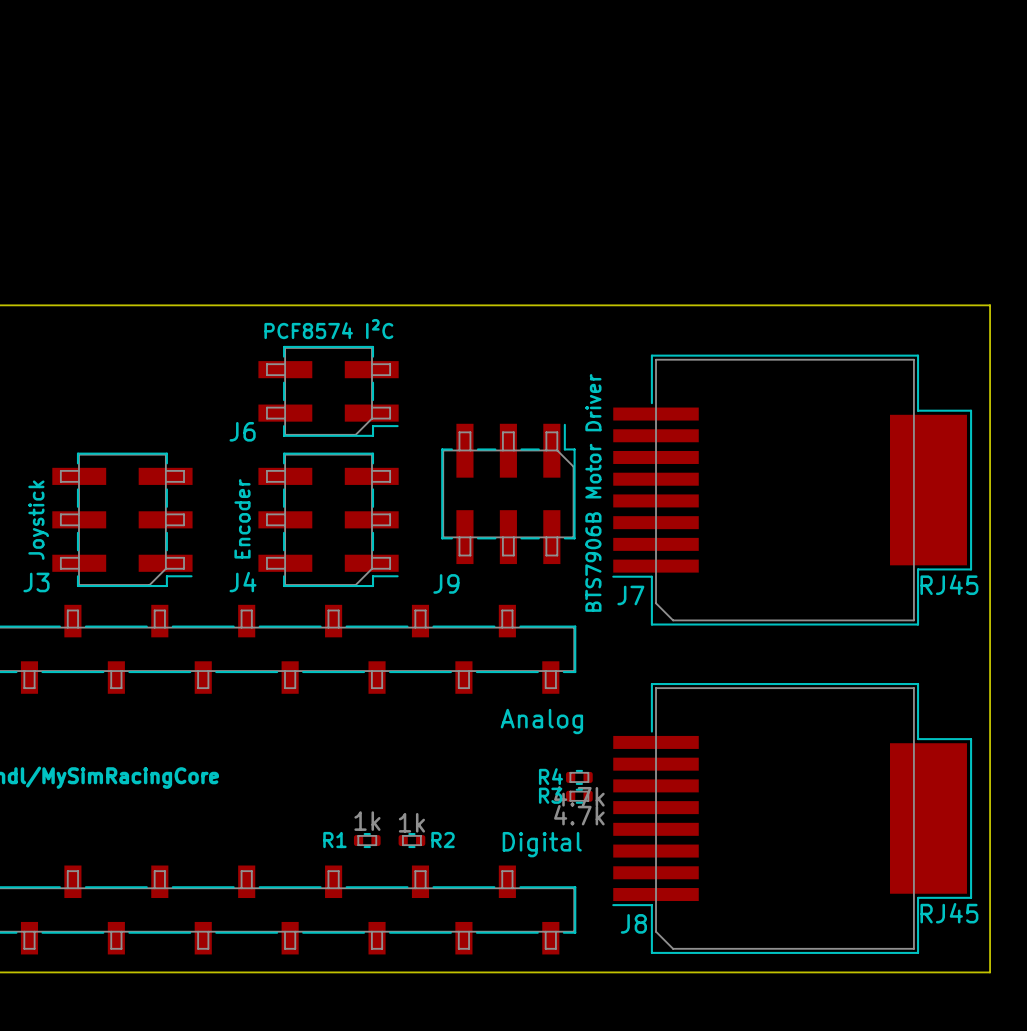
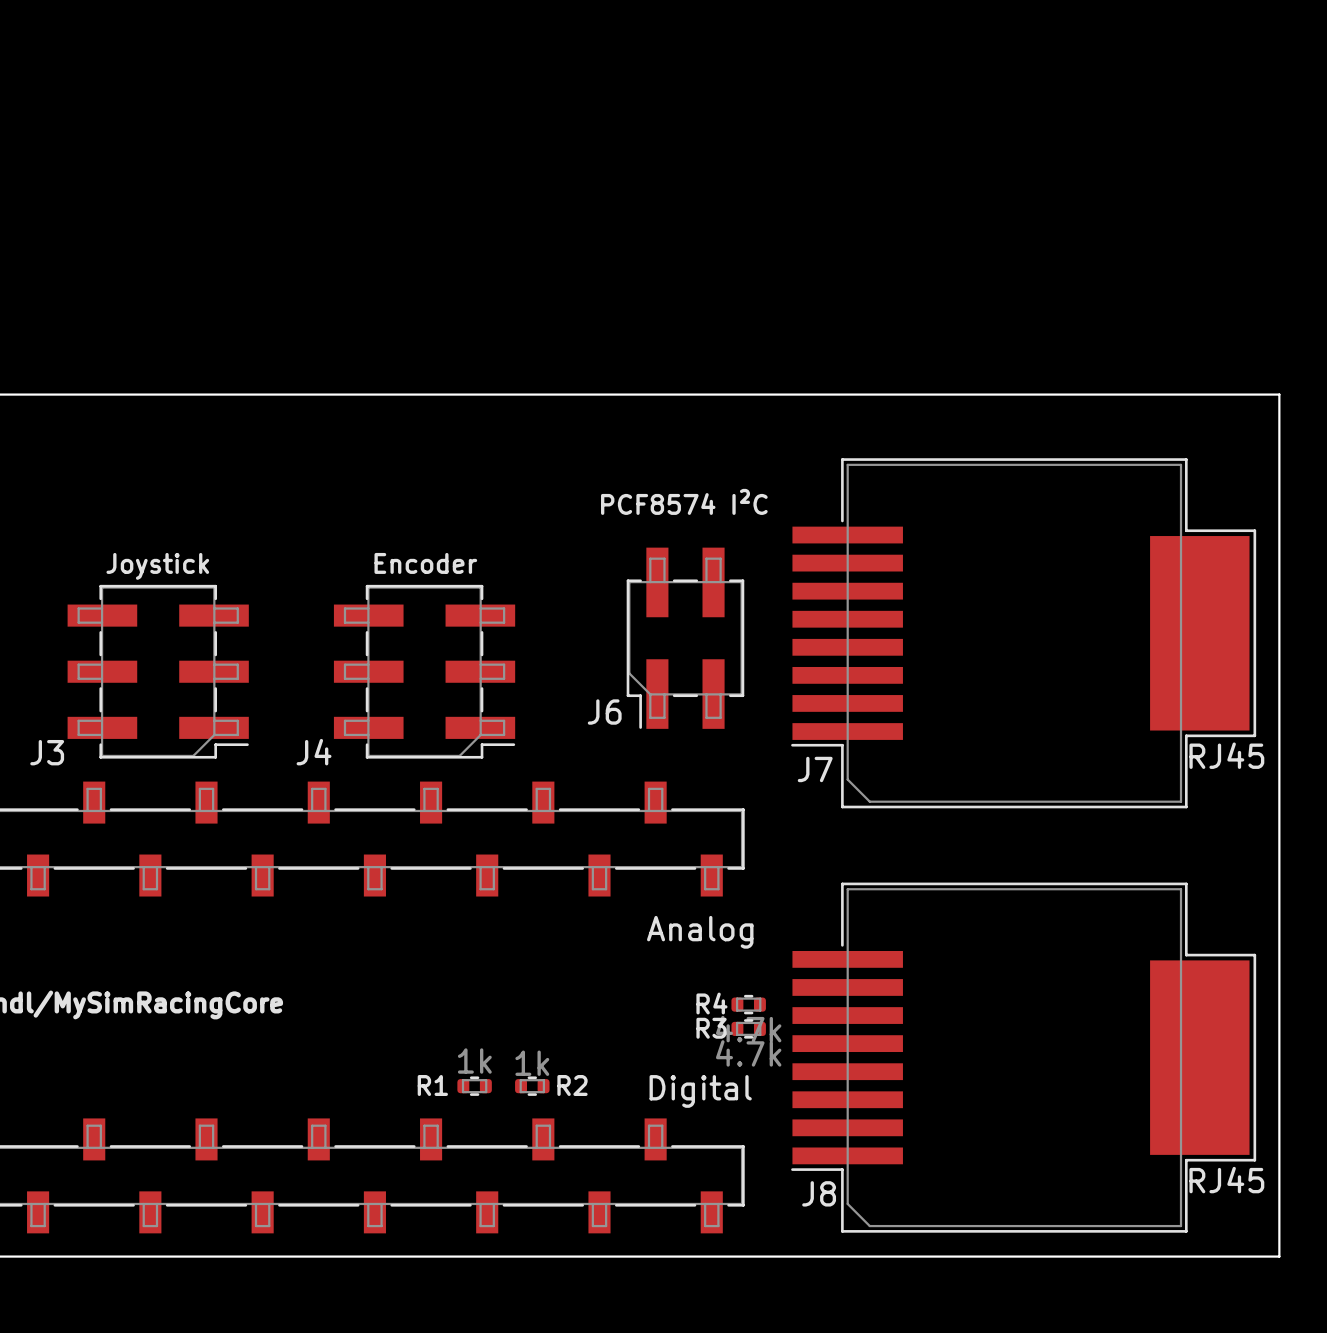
J6 value position: PCF8574 I²C (328, 329) -> PCF8574 I²C (684, 501)
J6 rotation: 0° (328, 391) -> 90° clockwise (685, 638)
J6 position: (328, 391) -> (685, 638)
J9: BTS7906B Motor Driver (508, 493) -> none
J4 value rotation: 0° (242, 518) -> 90° clockwise (425, 563)
J4 value position: Encoder (242, 518) -> Encoder (425, 563)
J3 value rotation: 0° (38, 520) -> 90° clockwise (157, 566)
J3 value position: Joystick (38, 520) -> Joystick (157, 566)

